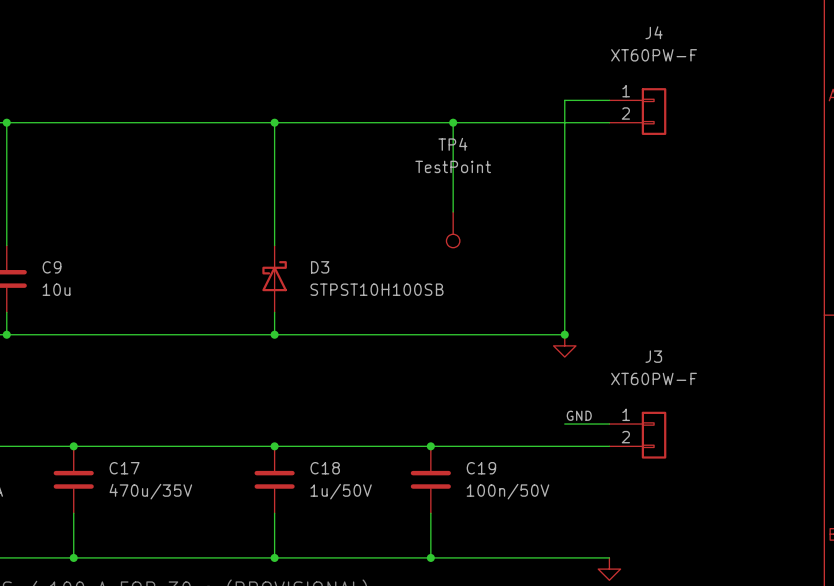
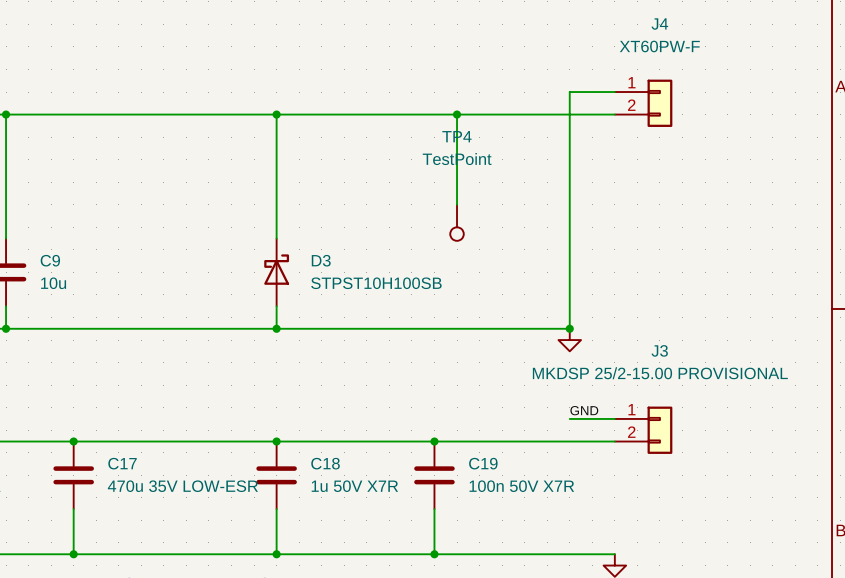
J3 value: XT60PW-F (654, 378) -> MKDSP 25/2-15.00 PROVISIONAL (660, 373)
C17 value: 470u/35V (150, 491) -> 470u 35V LOW-ESR (182, 486)
C18 value: 1u/50V (341, 491) -> 1u 50V X7R (354, 486)
C19 value: 100n/50V (507, 491) -> 100n 50V X7R (521, 486)

